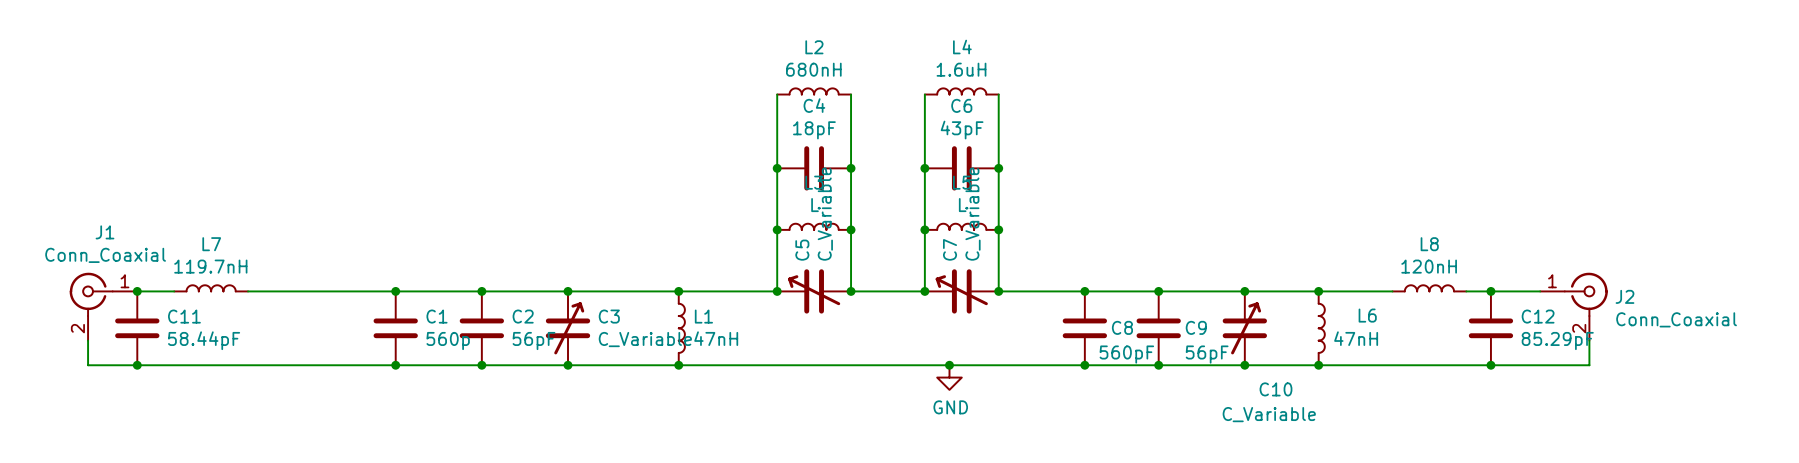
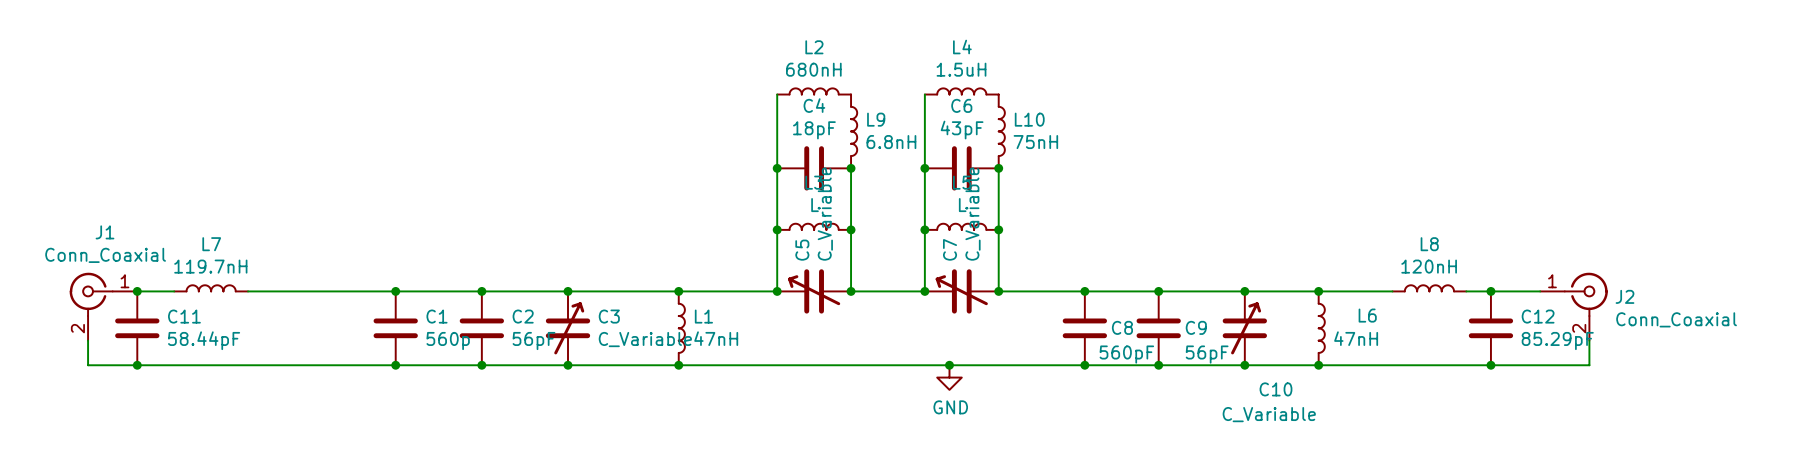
L4 value: 1.6uH (961, 69) -> 1.5uH (961, 69)
wire: (851, 94) (851, 168) -> none
wire: (998, 94) (998, 168) -> none
L9: none -> 6.8nH (854, 131)
L10: none -> 75nH (1001, 131)

